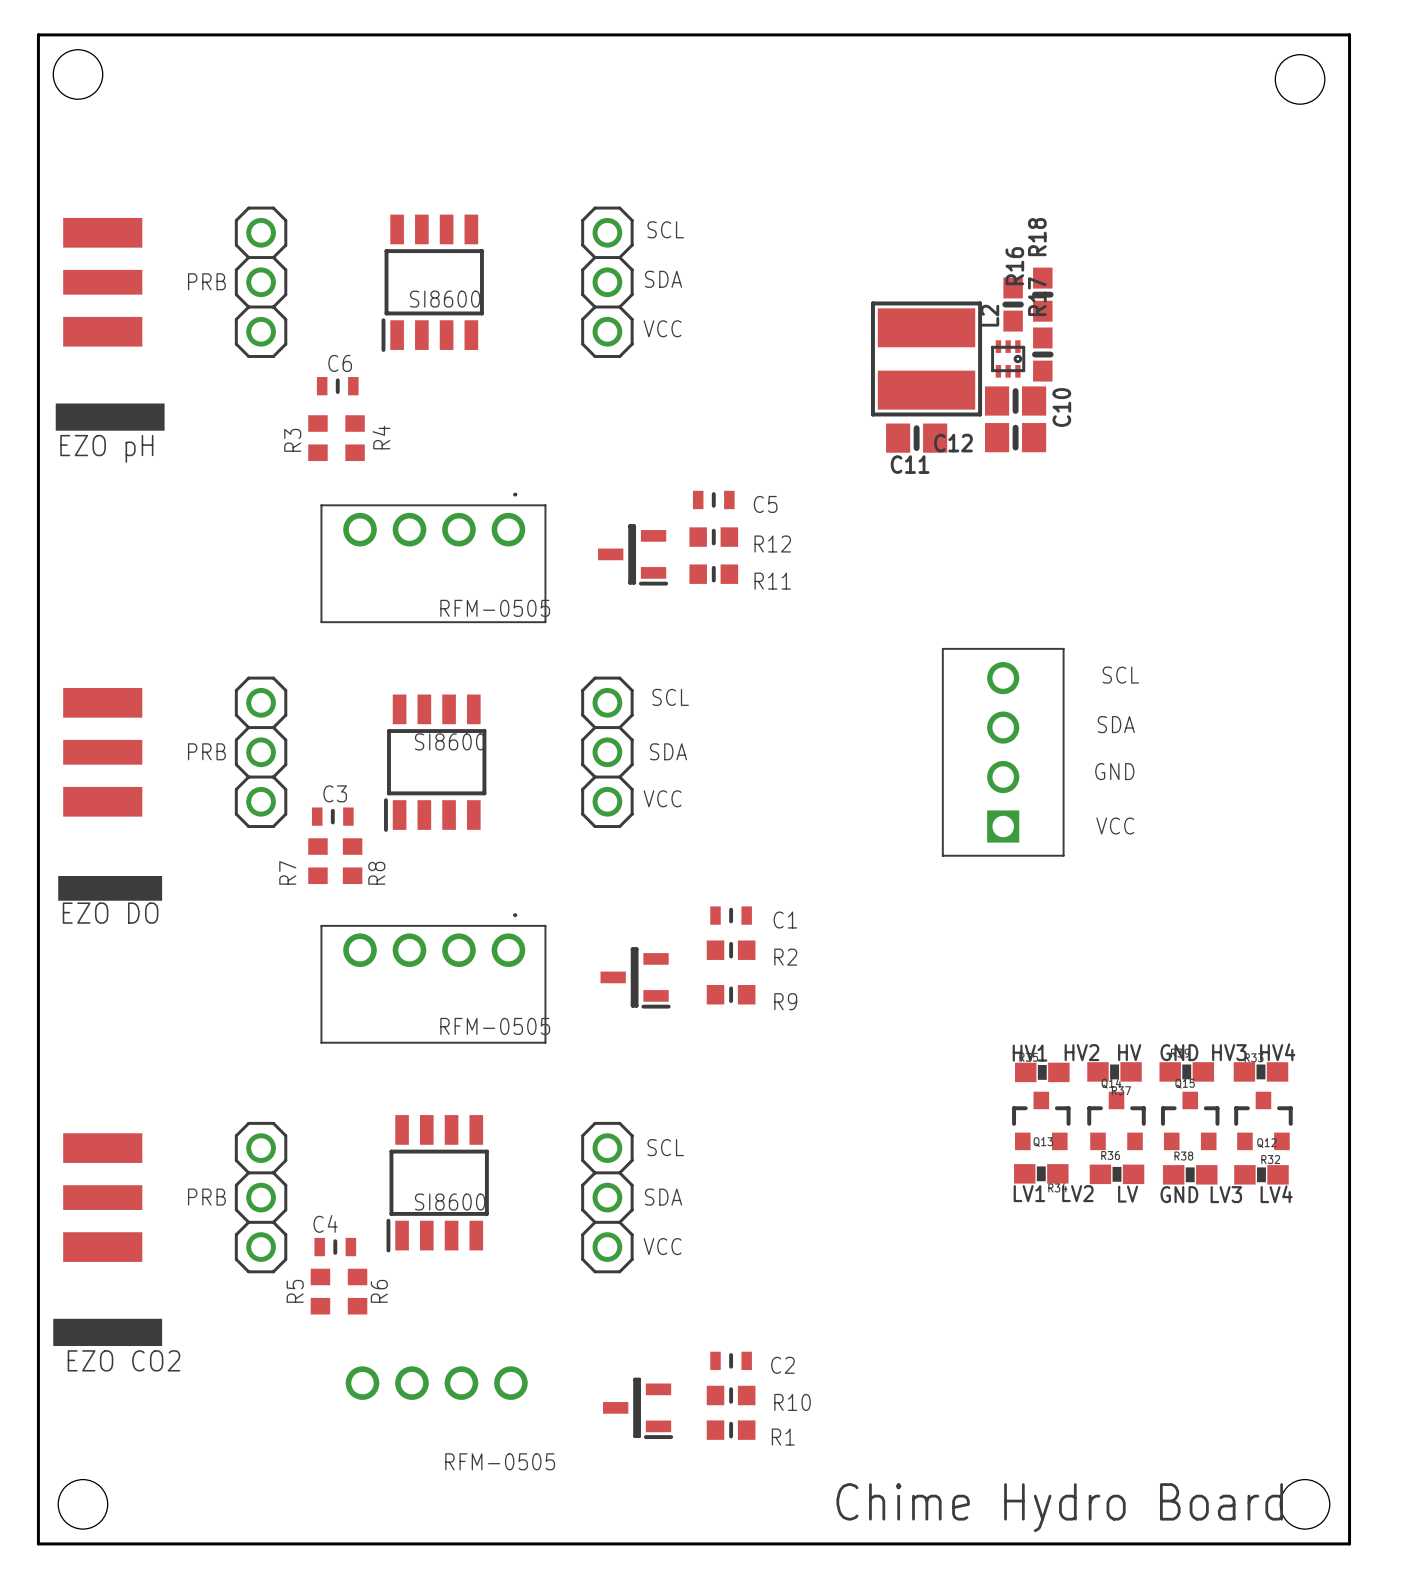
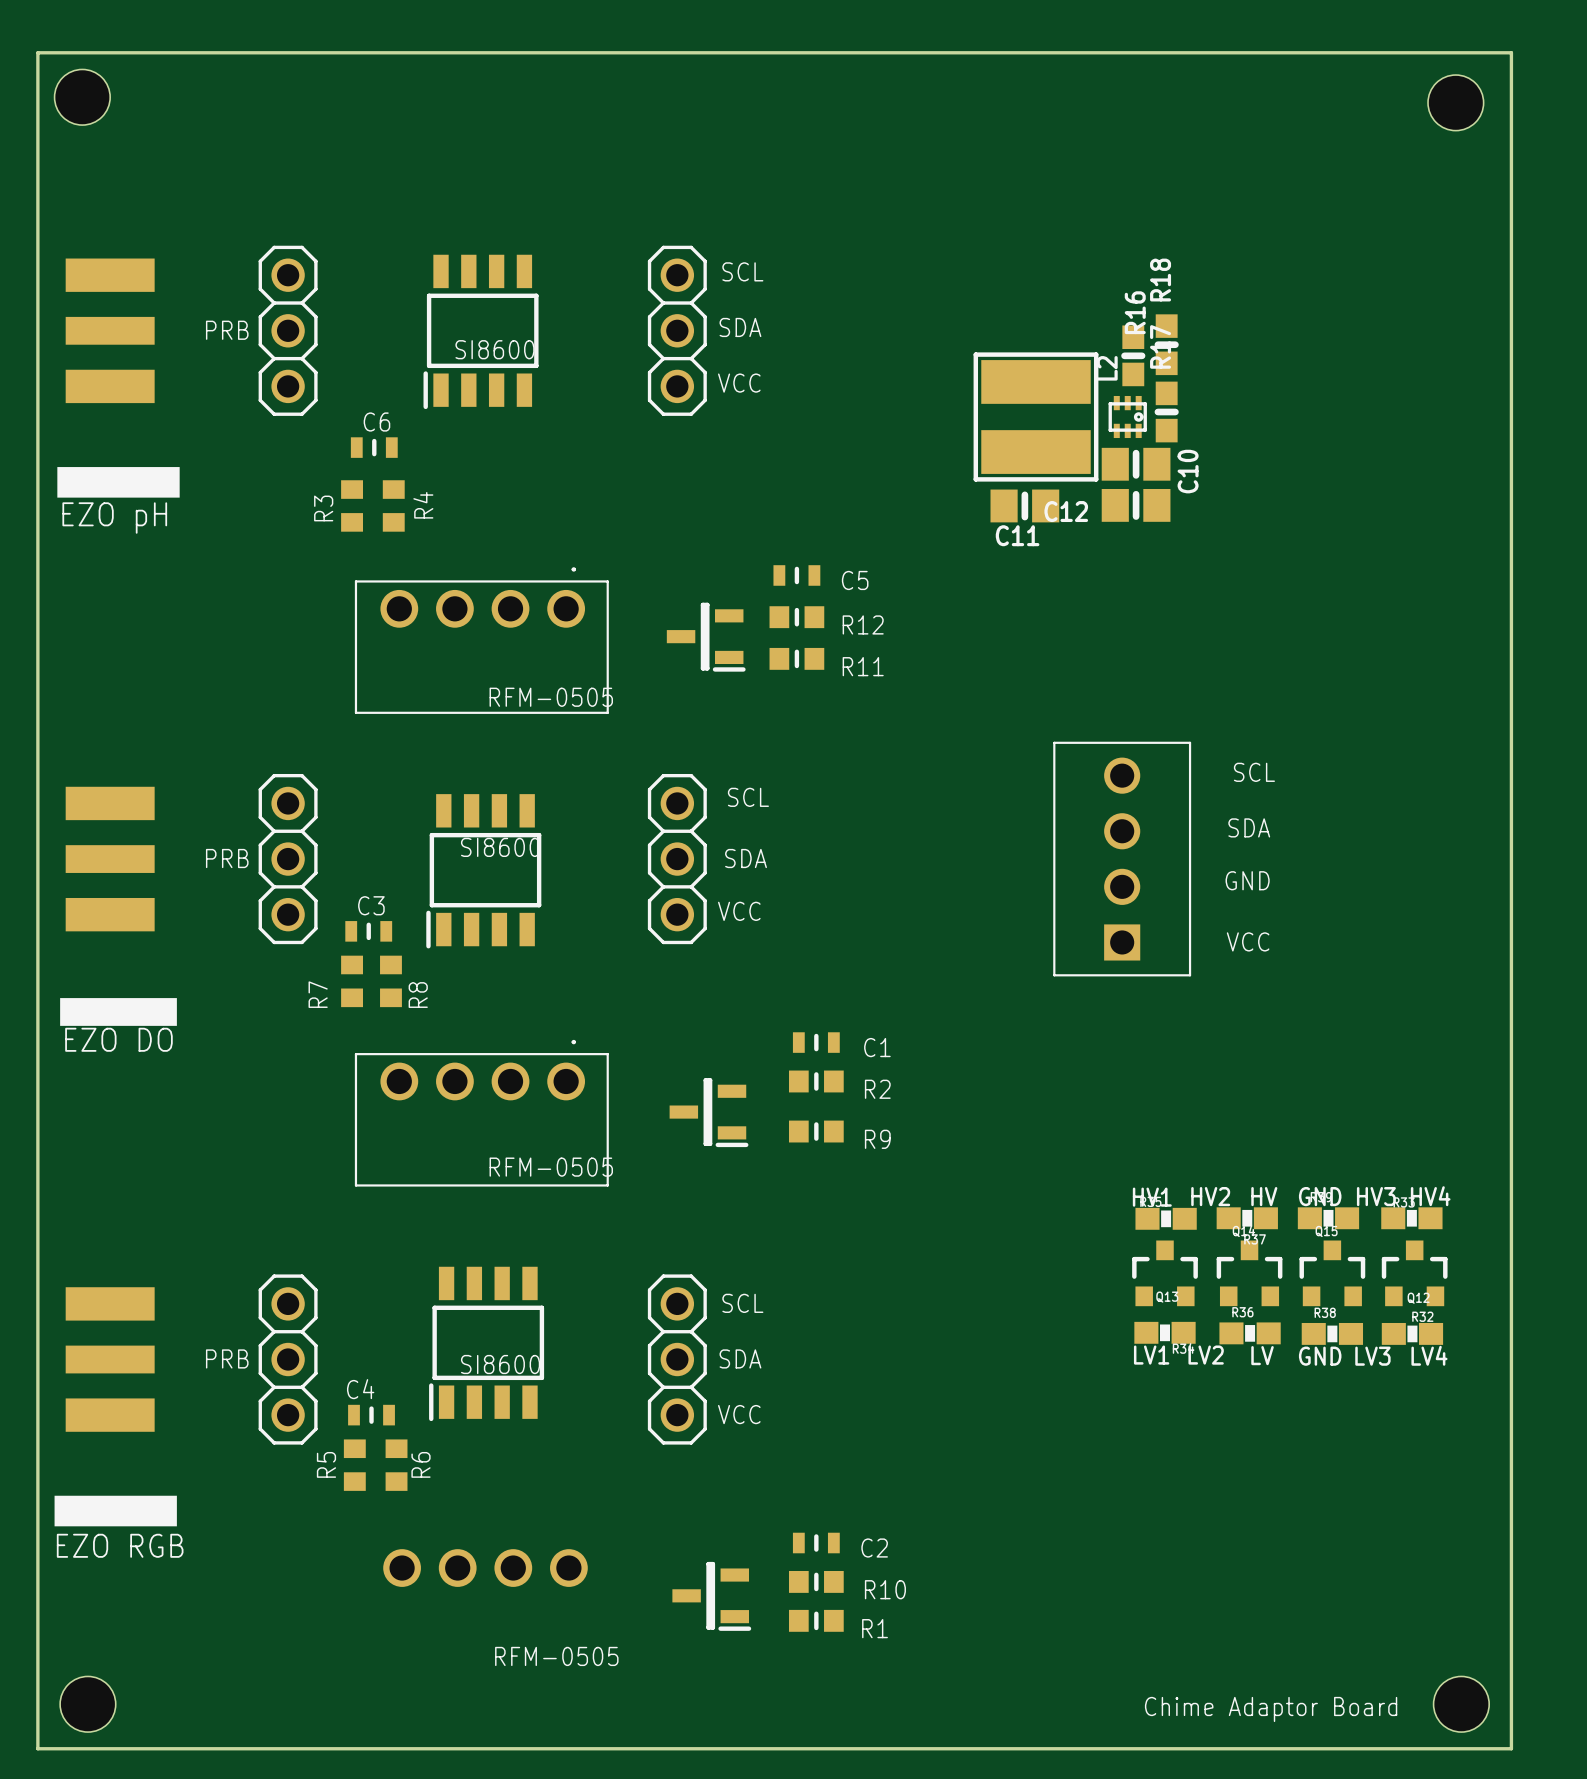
text: EZO CO2 (123, 1360) -> EZO RGB (120, 1545)
text: Chime Hydro Board (1059, 1507) -> Chime Adaptor Board (1271, 1709)

